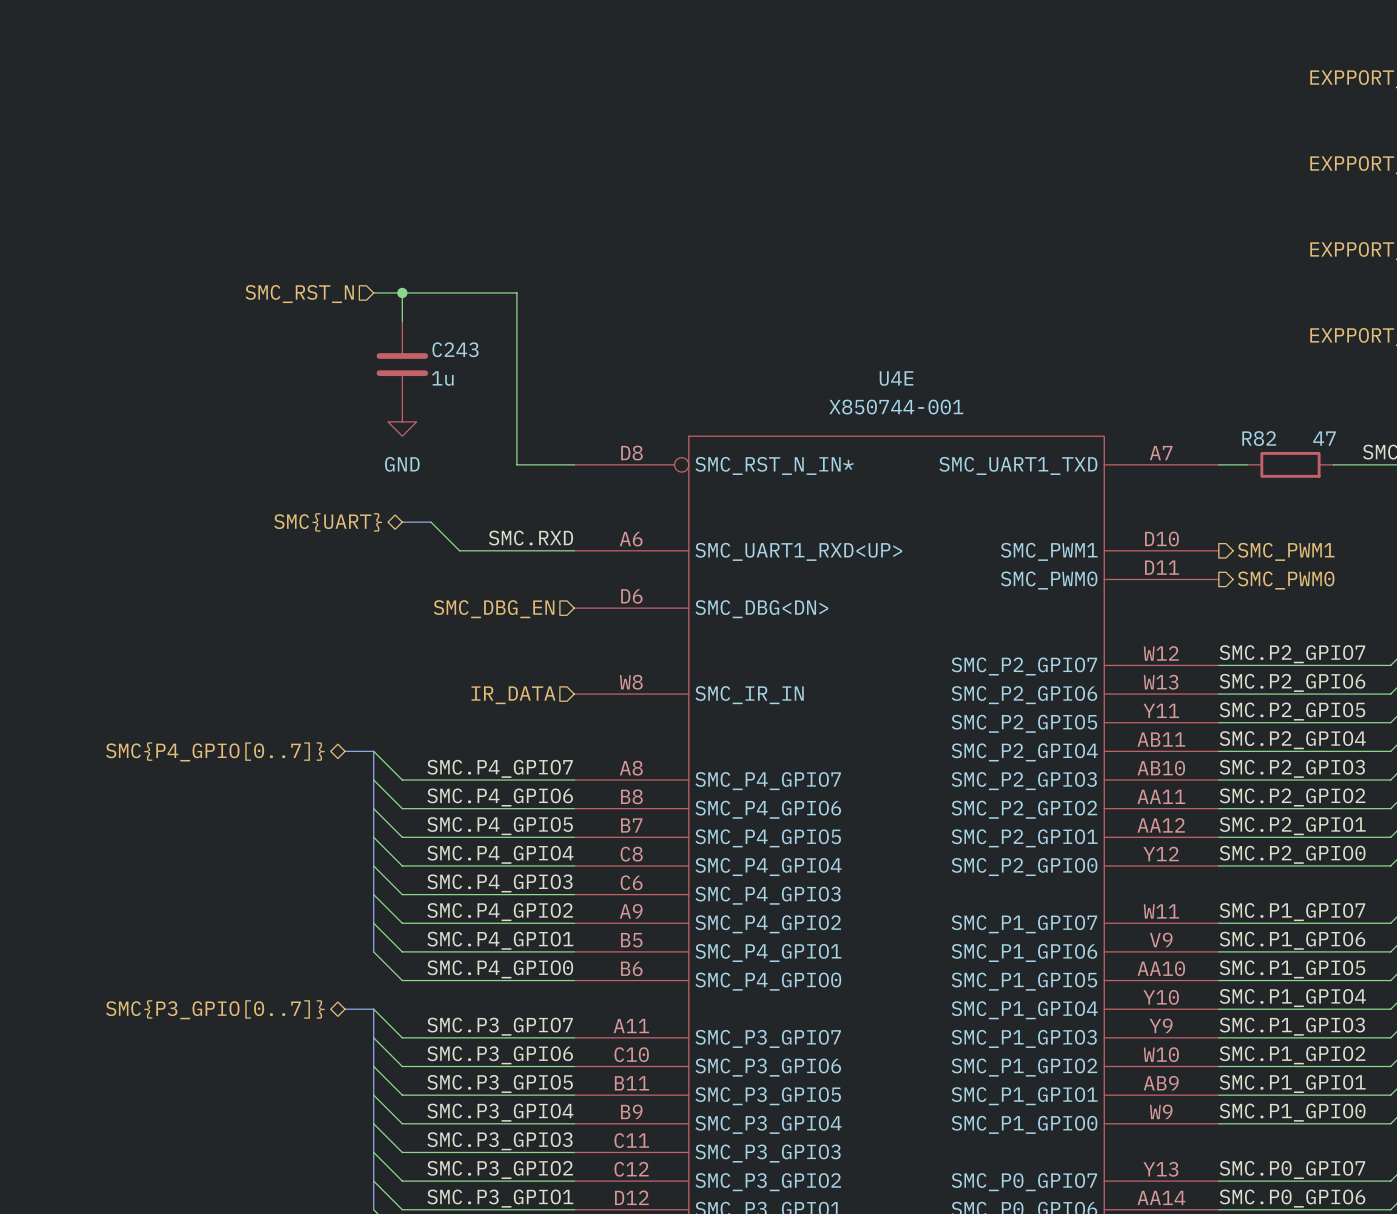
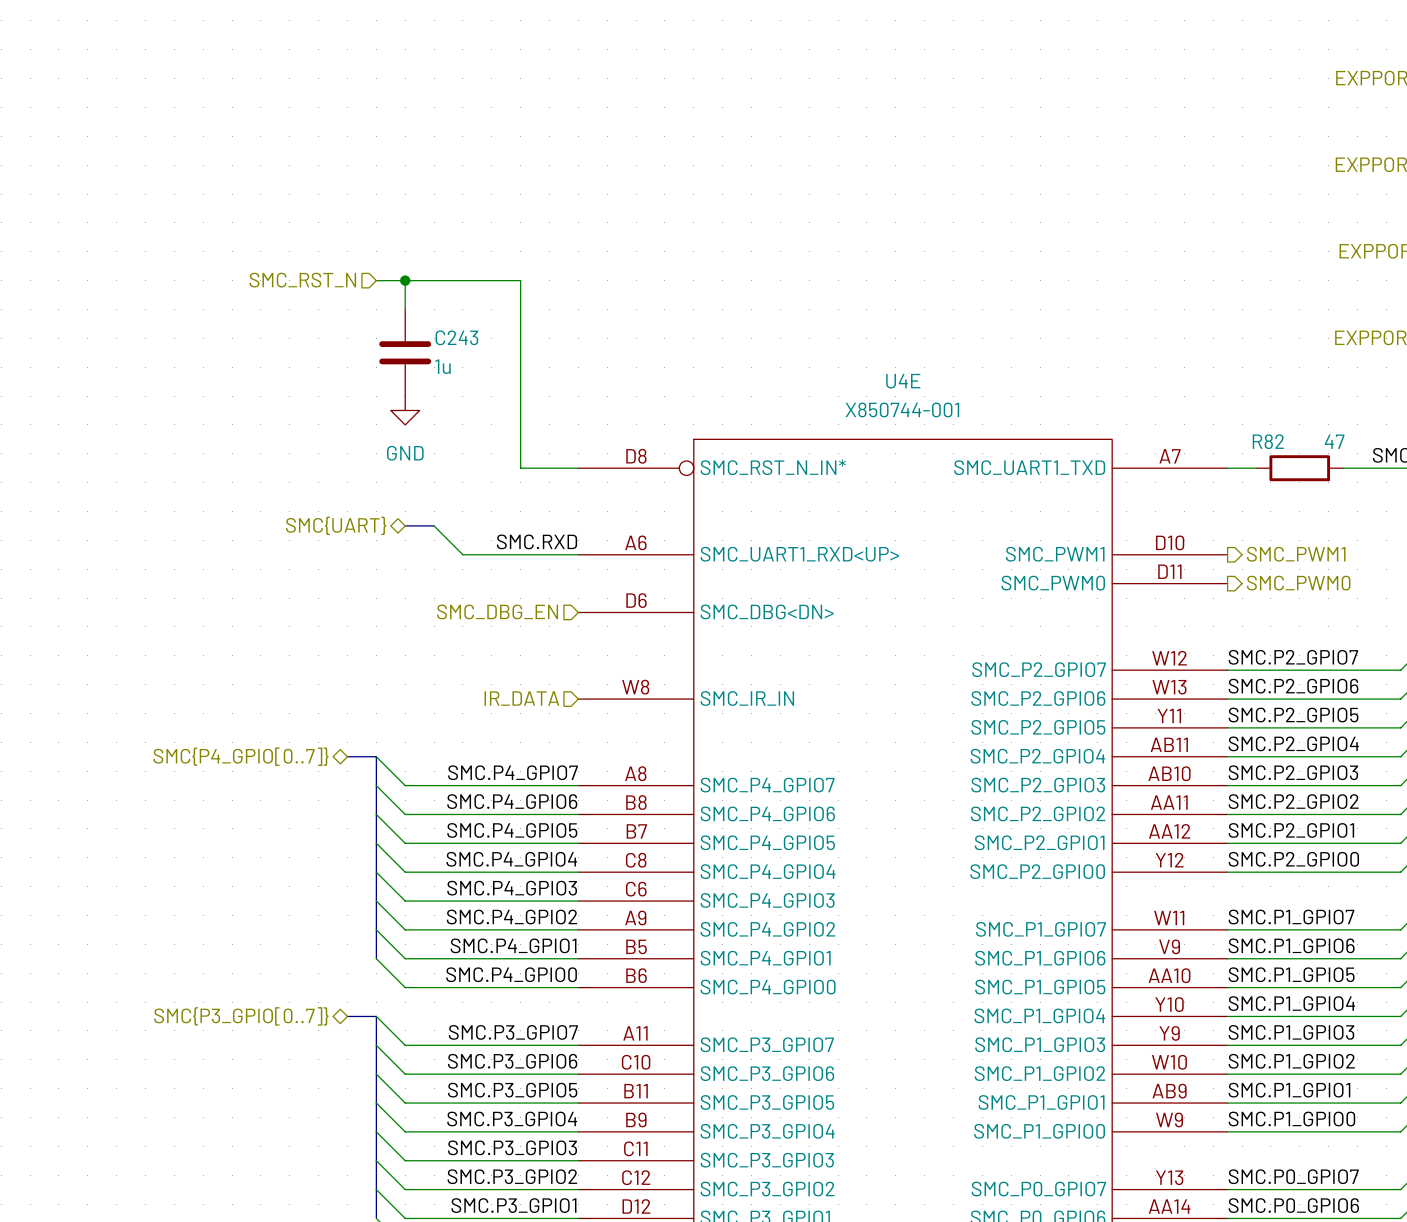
wire: (373, 292) (516, 292) -> (376, 280) (520, 280) (520, 295)
junction position: (402, 292) -> (405, 280)
hierarchical label position: SMC_RST_N (299, 294) -> SMC_RST_N (302, 280)
C243 position: (402, 364) -> (405, 352)
power symbol position: GND (402, 421) -> GND (405, 410)

